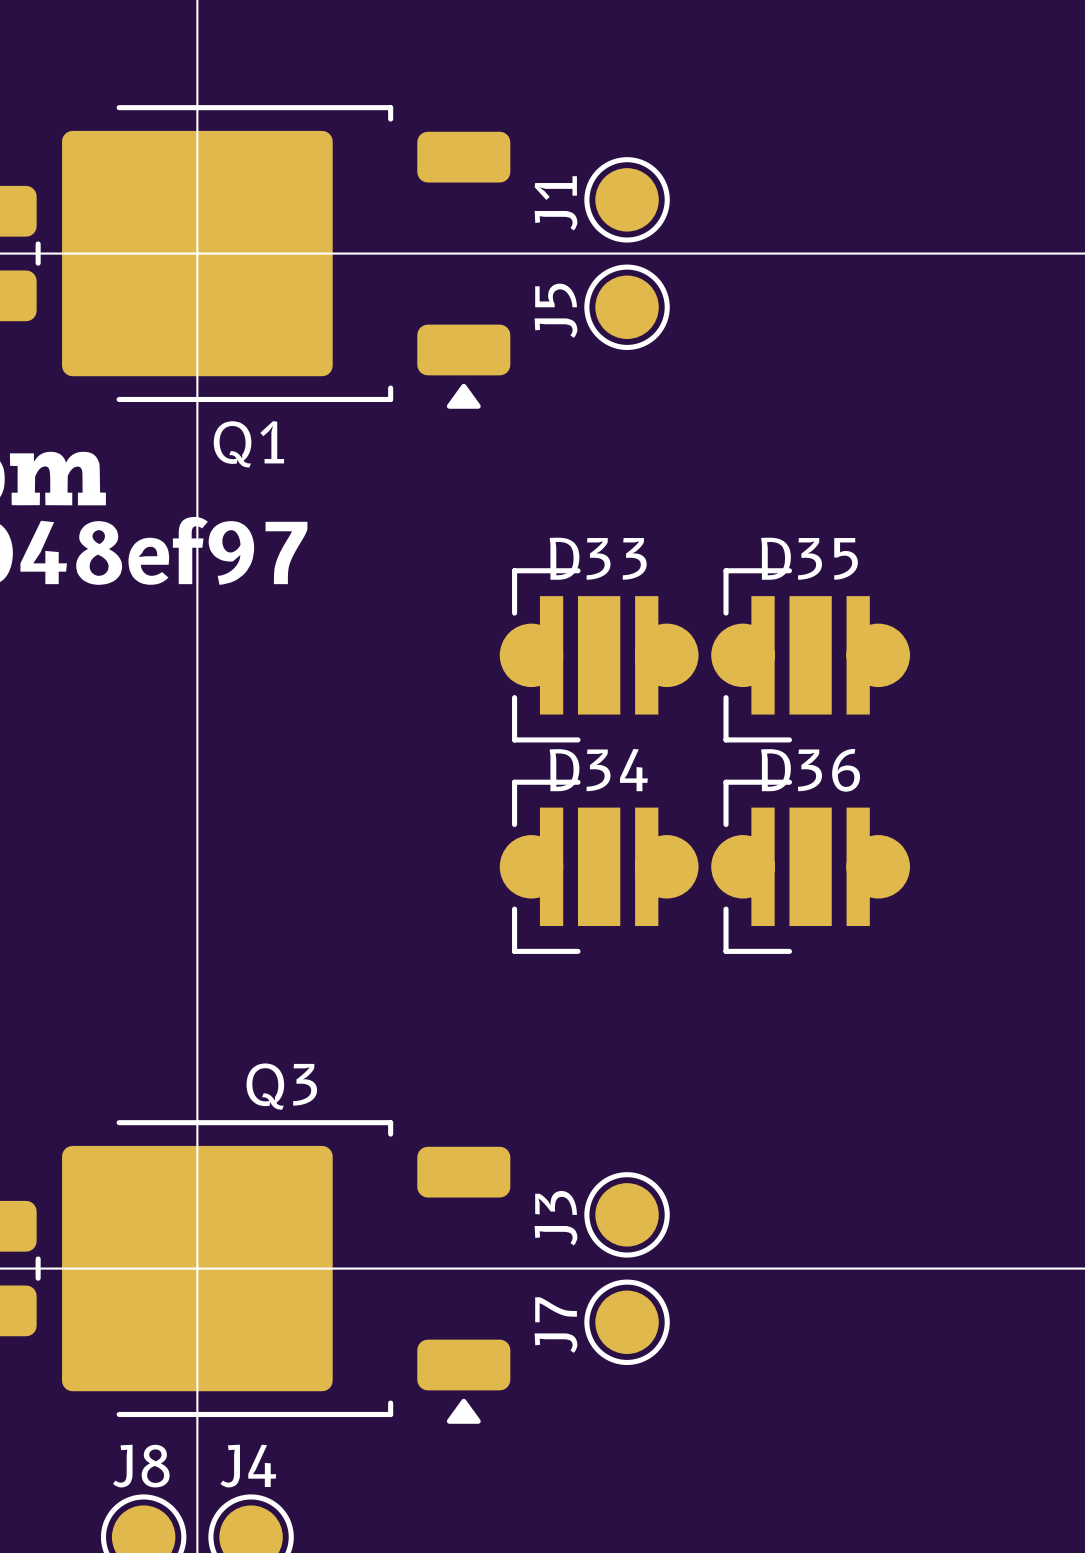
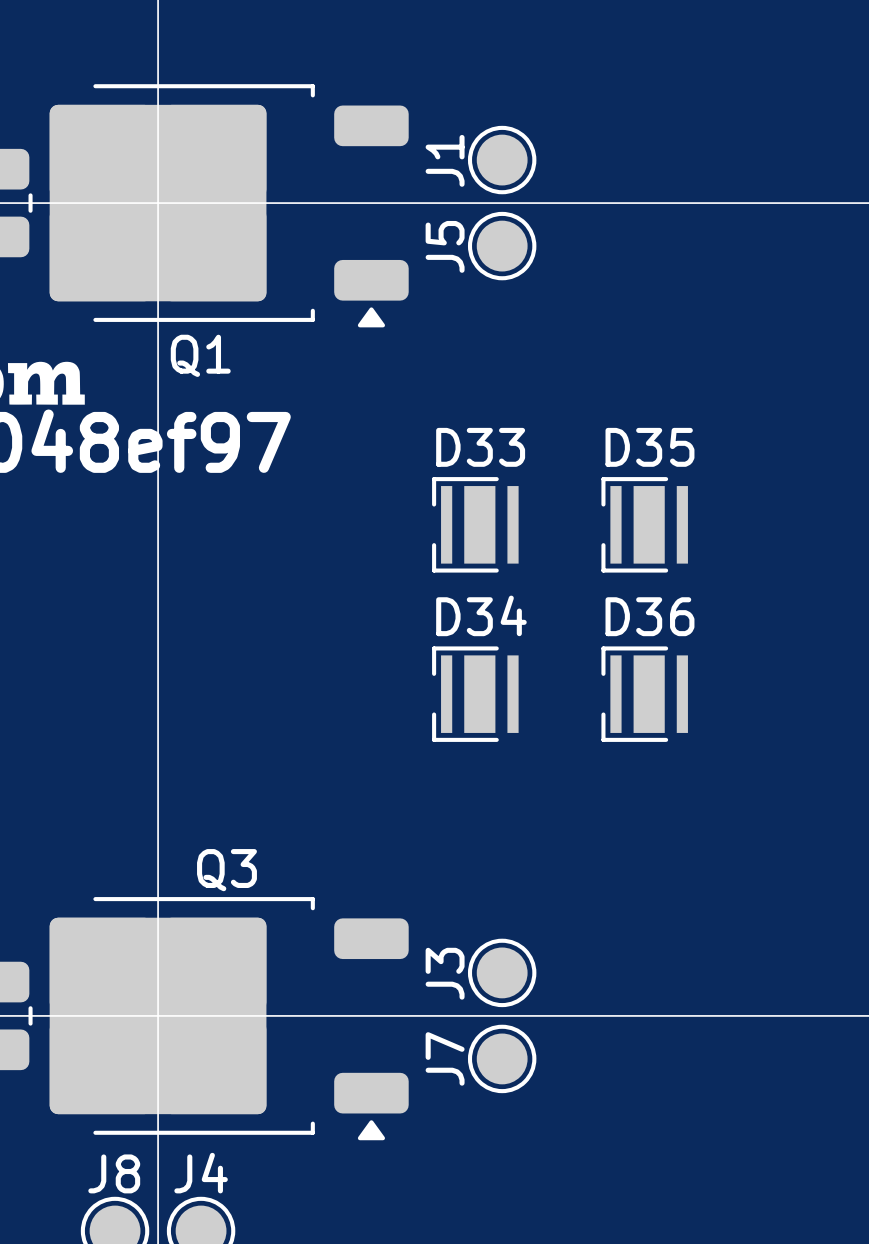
Q1 footprint: [62, 105, 511, 409] -> [49, 84, 409, 328]
D33 footprint: [499, 568, 699, 743] -> [432, 477, 519, 573]
D35 footprint: [711, 568, 910, 743] -> [601, 477, 688, 573]
D34 footprint: [499, 779, 699, 954] -> [432, 646, 519, 742]
D36 footprint: [711, 779, 910, 954] -> [601, 646, 688, 742]
Q3 footprint: [62, 1120, 511, 1424] -> [49, 897, 409, 1141]

